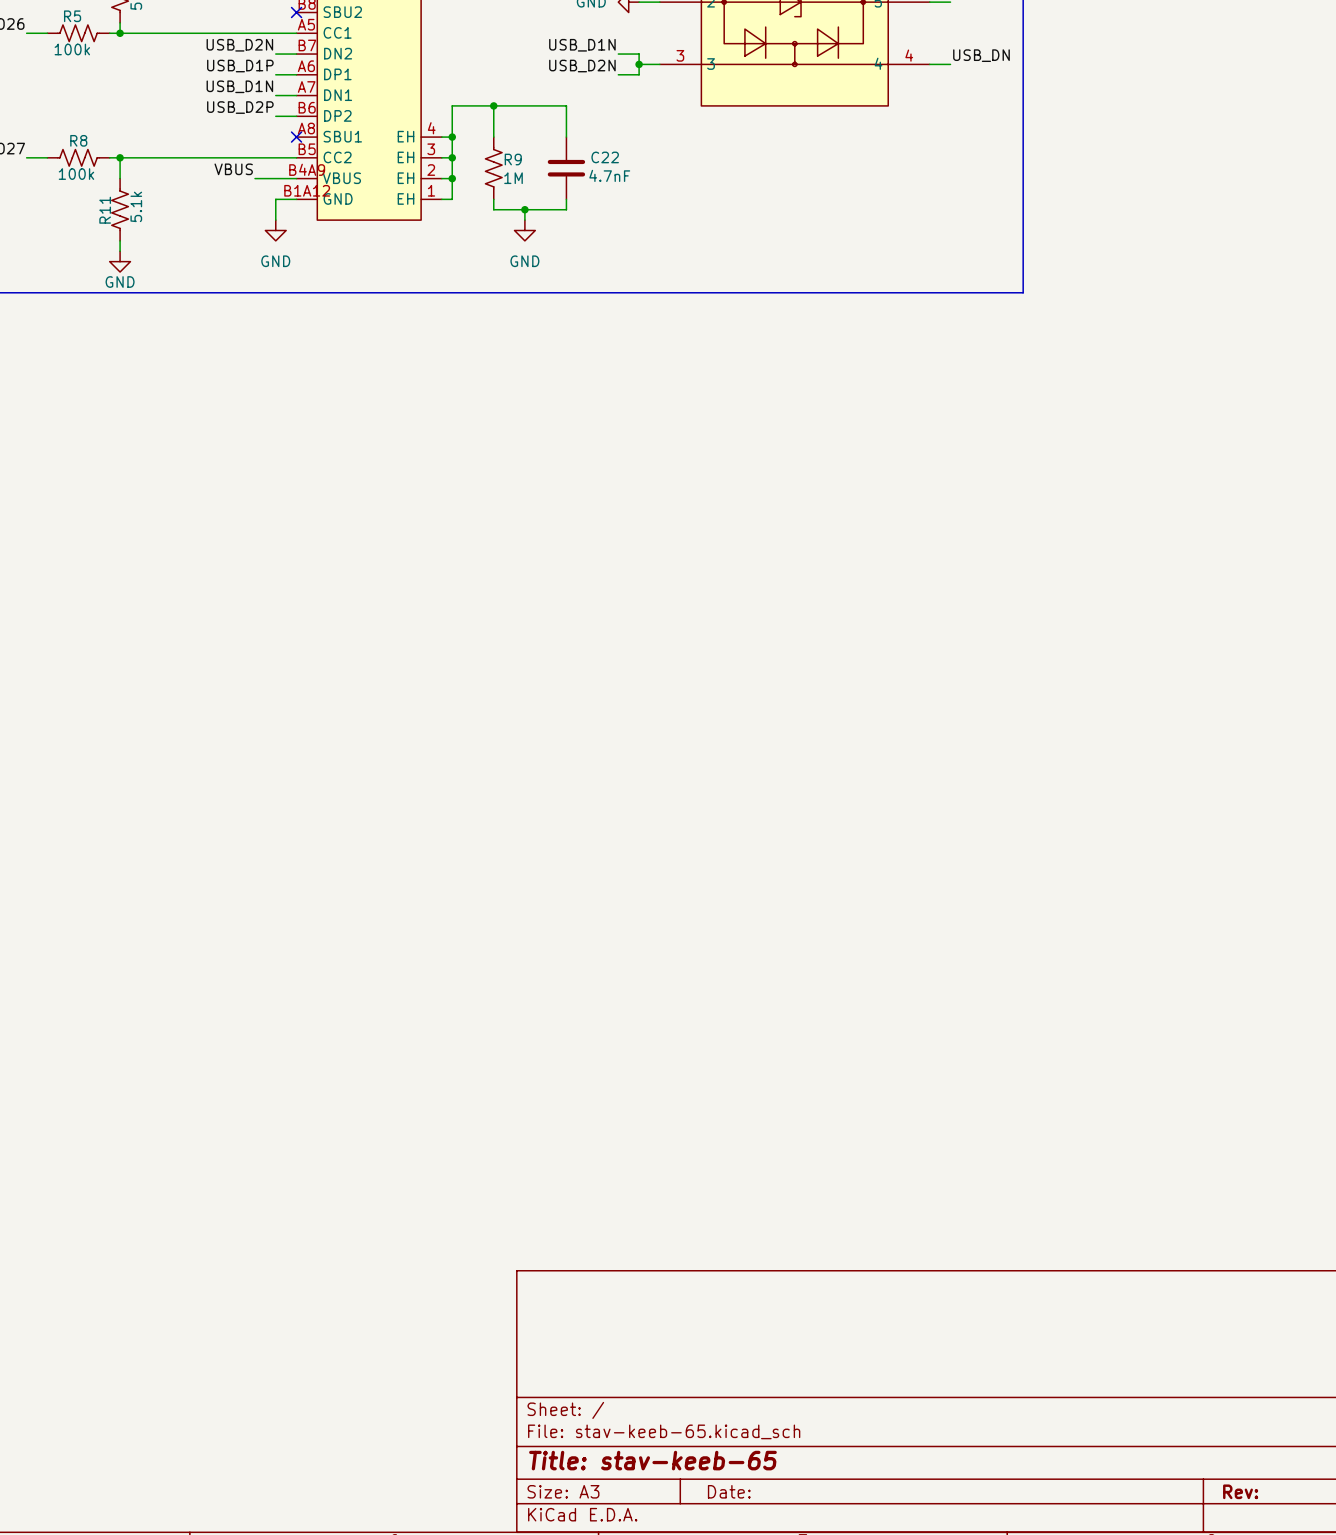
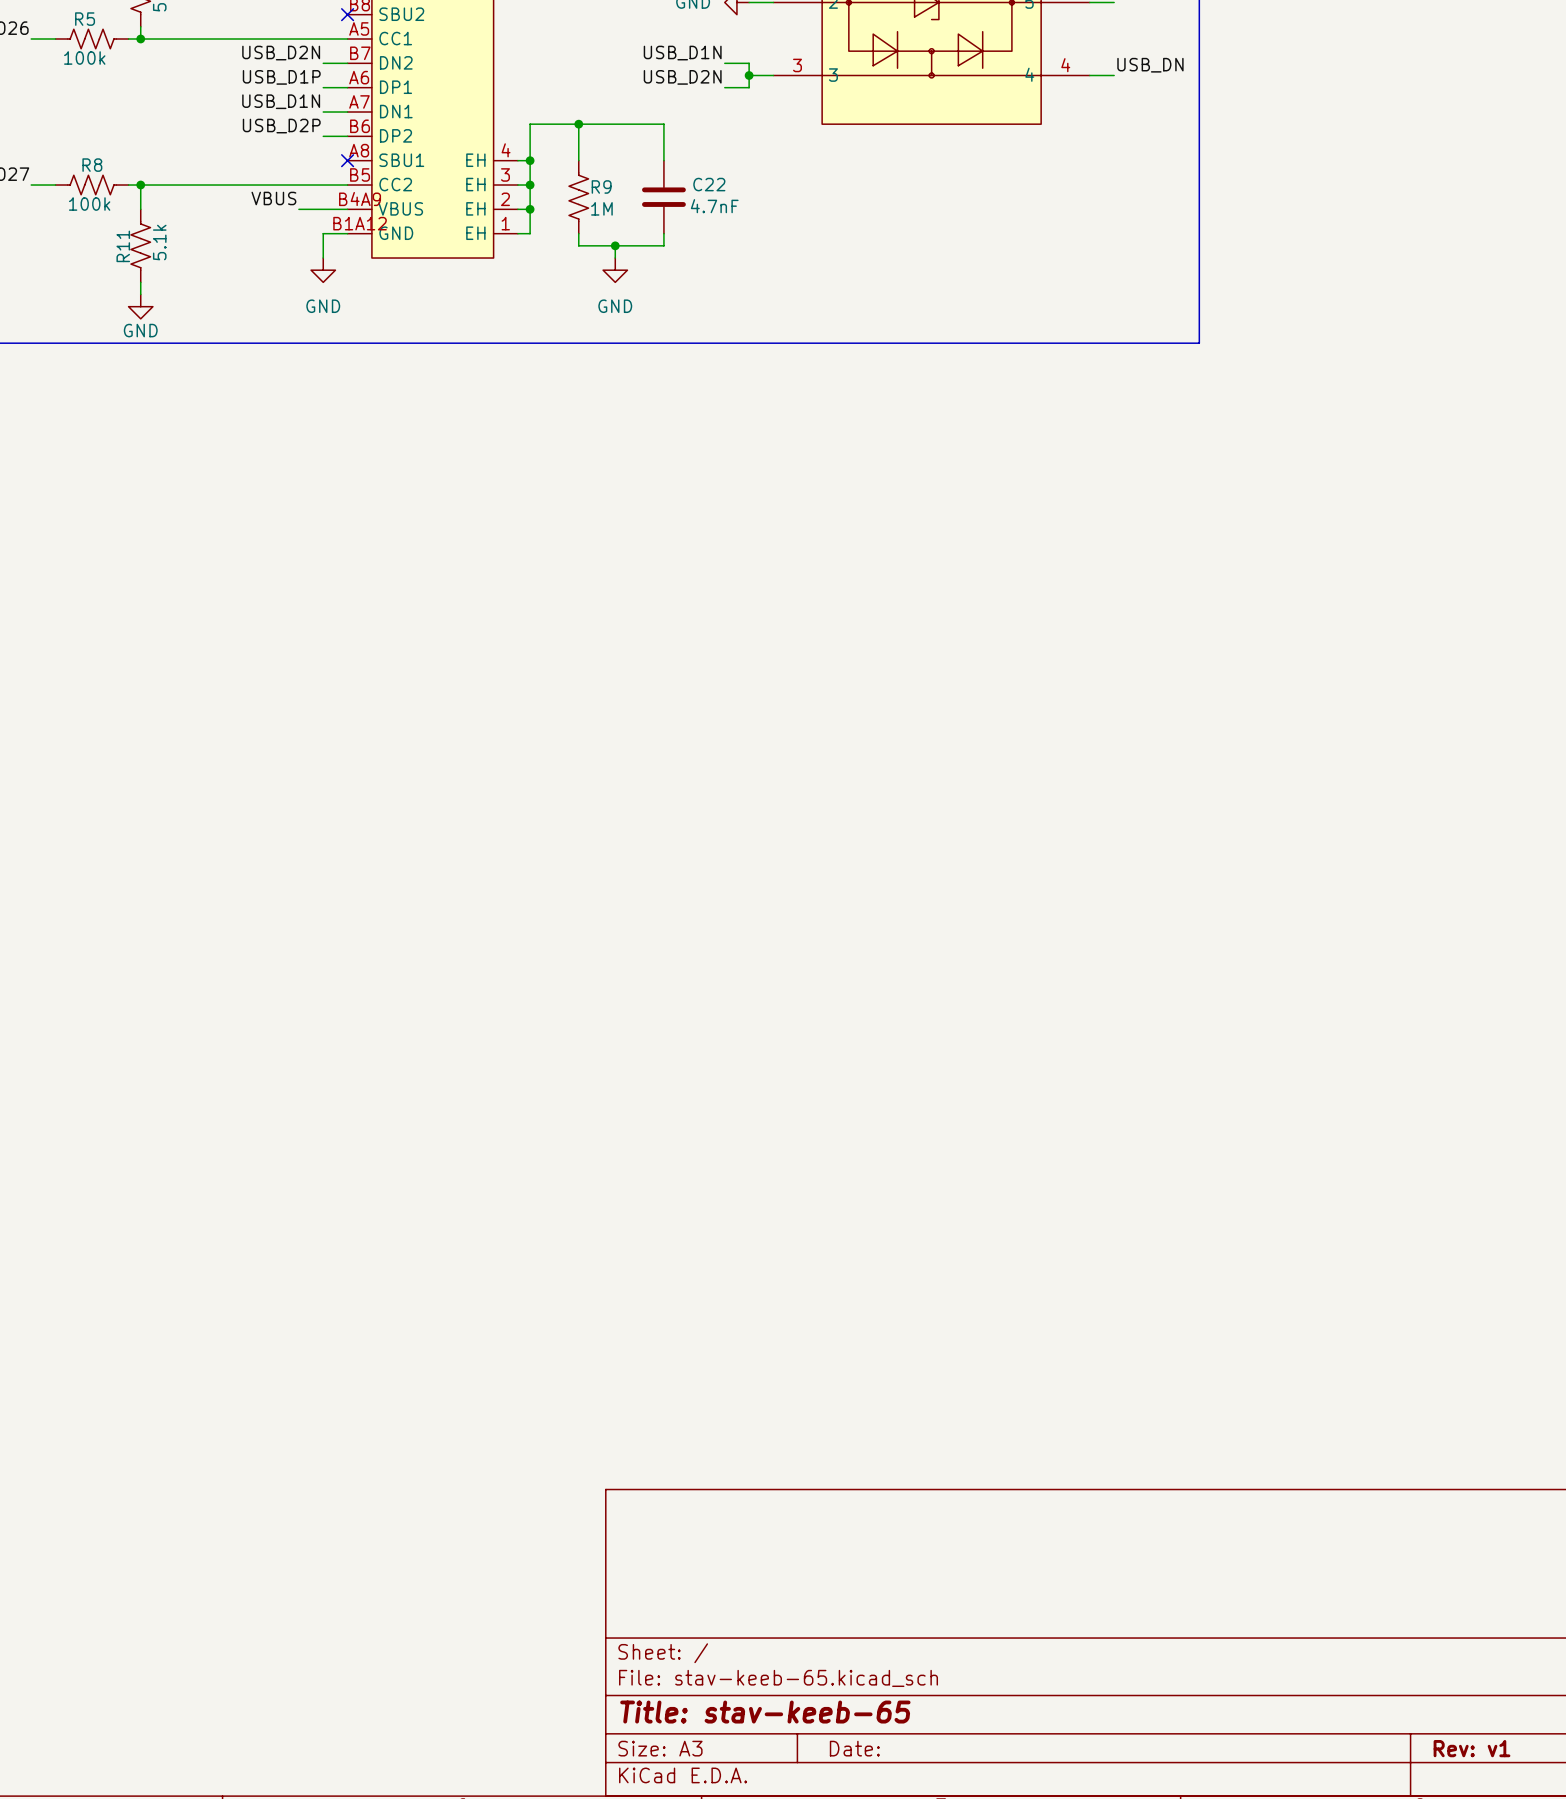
title block: Rev: (1240, 1491) -> Rev: v1 (1472, 1748)

